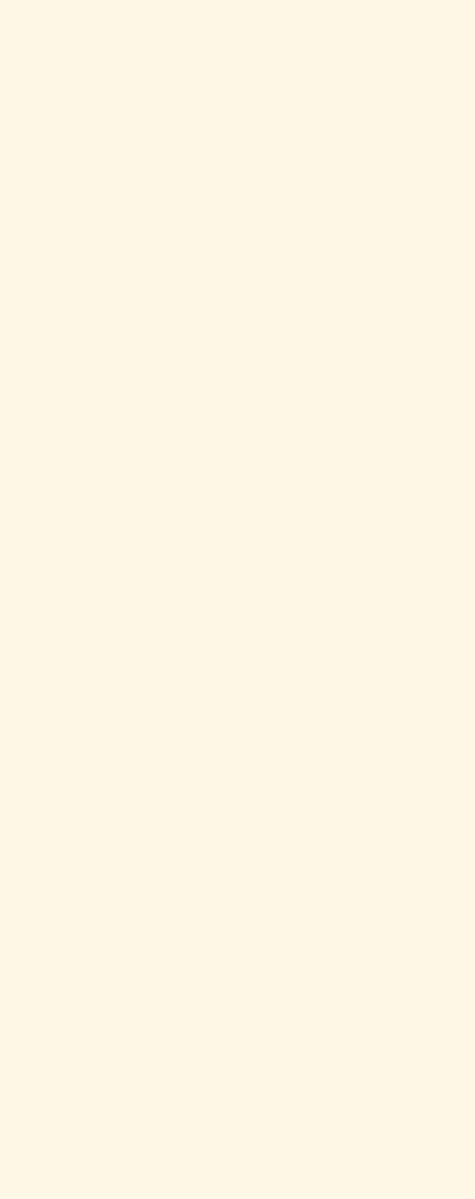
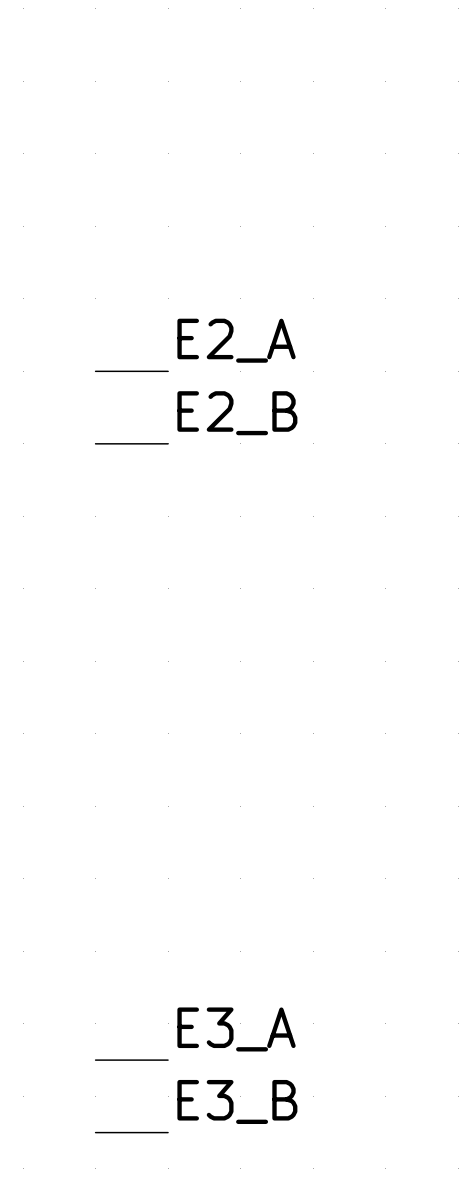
label: none -> E2_A (236, 340)
wire: none -> (95, 371) (168, 371)
label: none -> E2_B (237, 413)
wire: none -> (95, 443) (168, 443)
label: none -> E3_A (236, 1029)
wire: none -> (95, 1060) (168, 1060)
label: none -> E3_B (237, 1101)
wire: none -> (95, 1132) (168, 1132)

